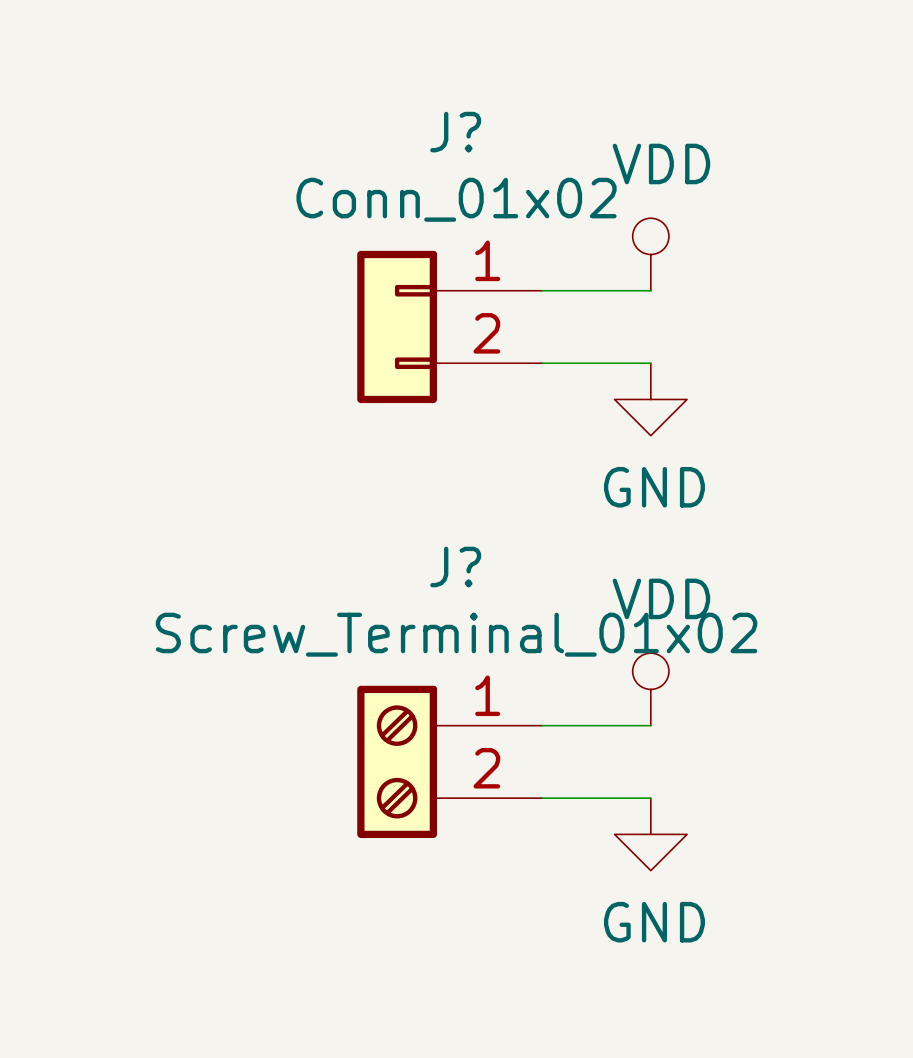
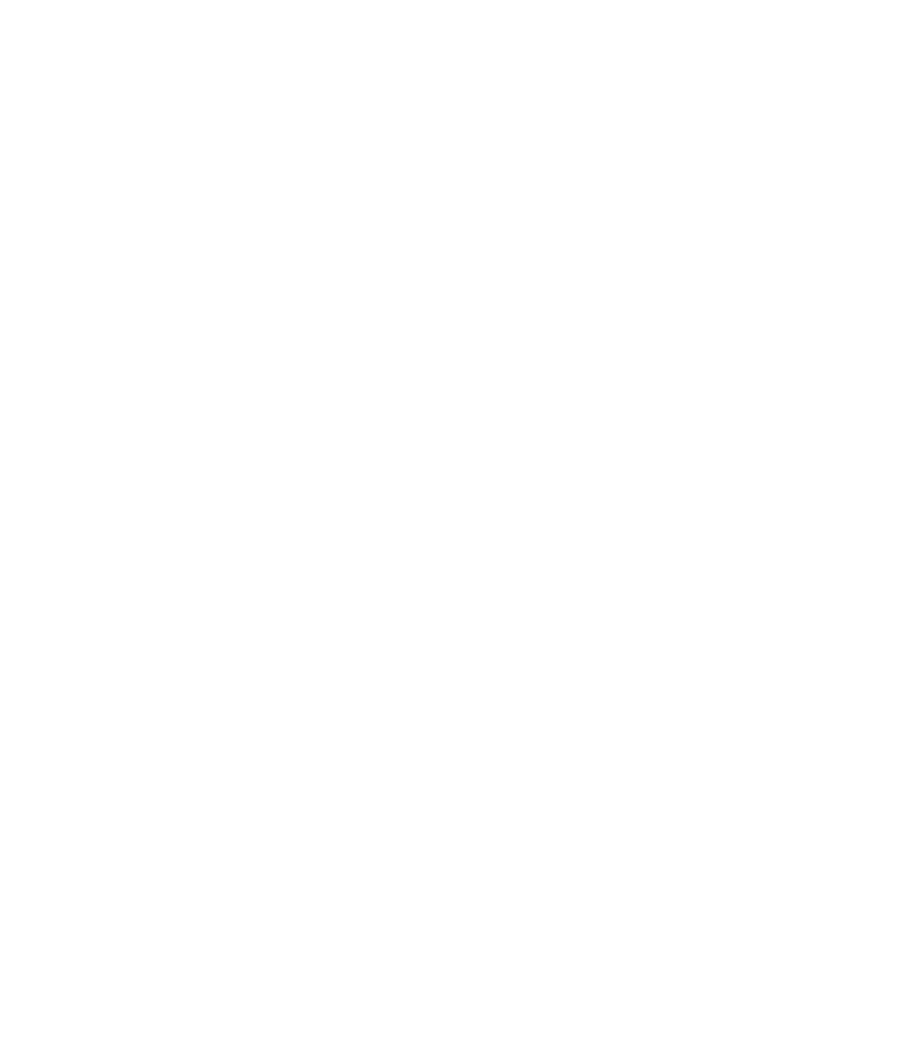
power symbol: VDD (650, 254) -> none
wire: (542, 290) (650, 290) -> none
J?: Conn_01x02 (449, 326) -> none
wire: (542, 363) (650, 363) -> none
power symbol: GND (650, 399) -> none
power symbol: VDD (650, 689) -> none
wire: (542, 725) (650, 725) -> none
J?: Screw_Terminal_01x02 (449, 761) -> none
wire: (542, 798) (650, 798) -> none
power symbol: GND (650, 834) -> none

